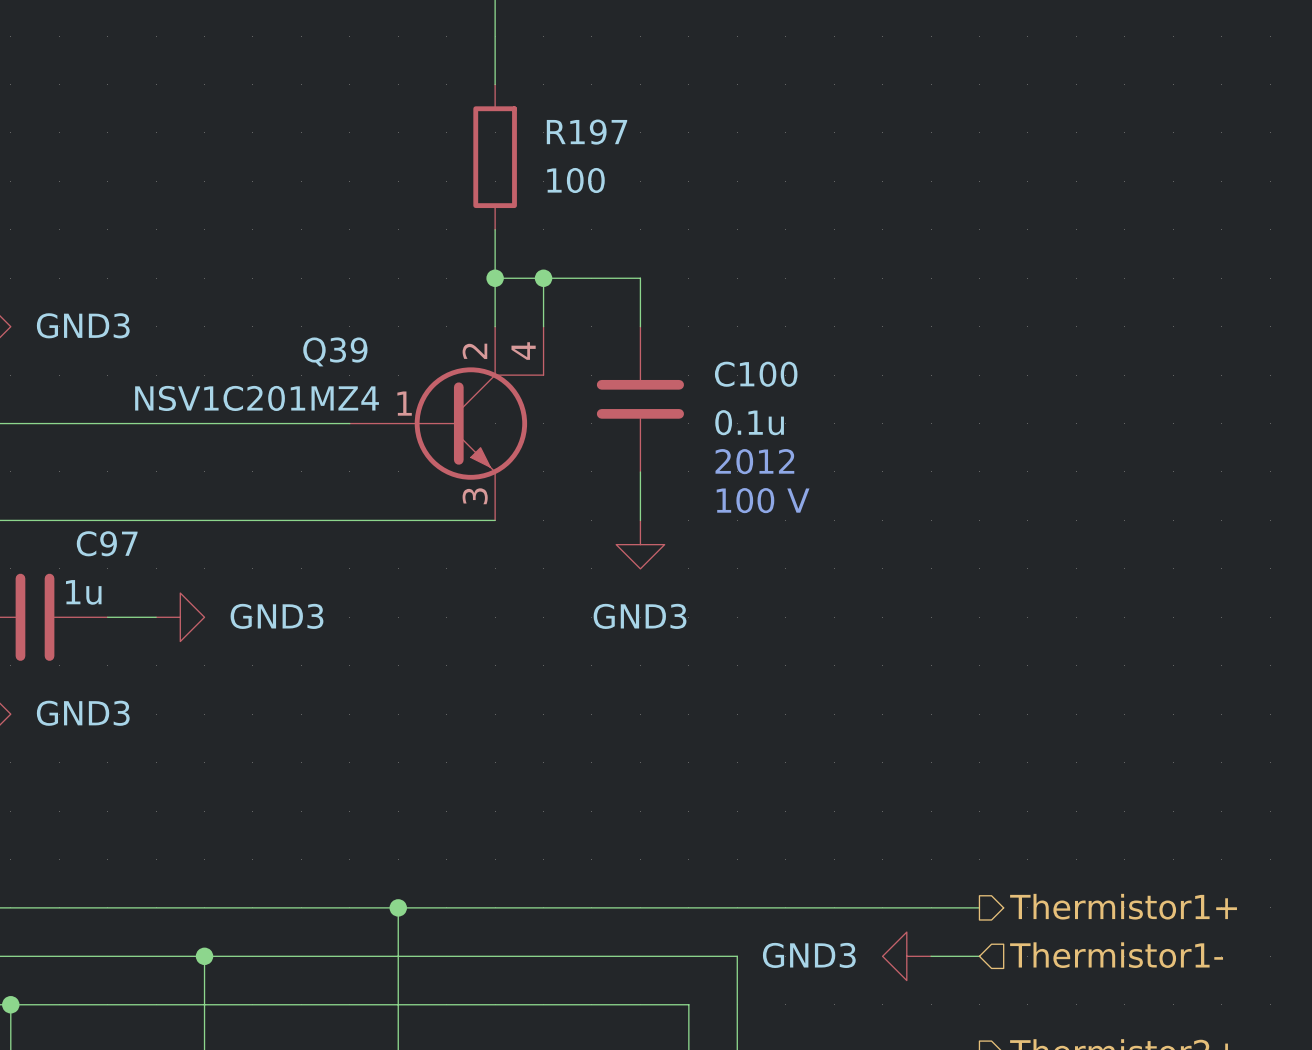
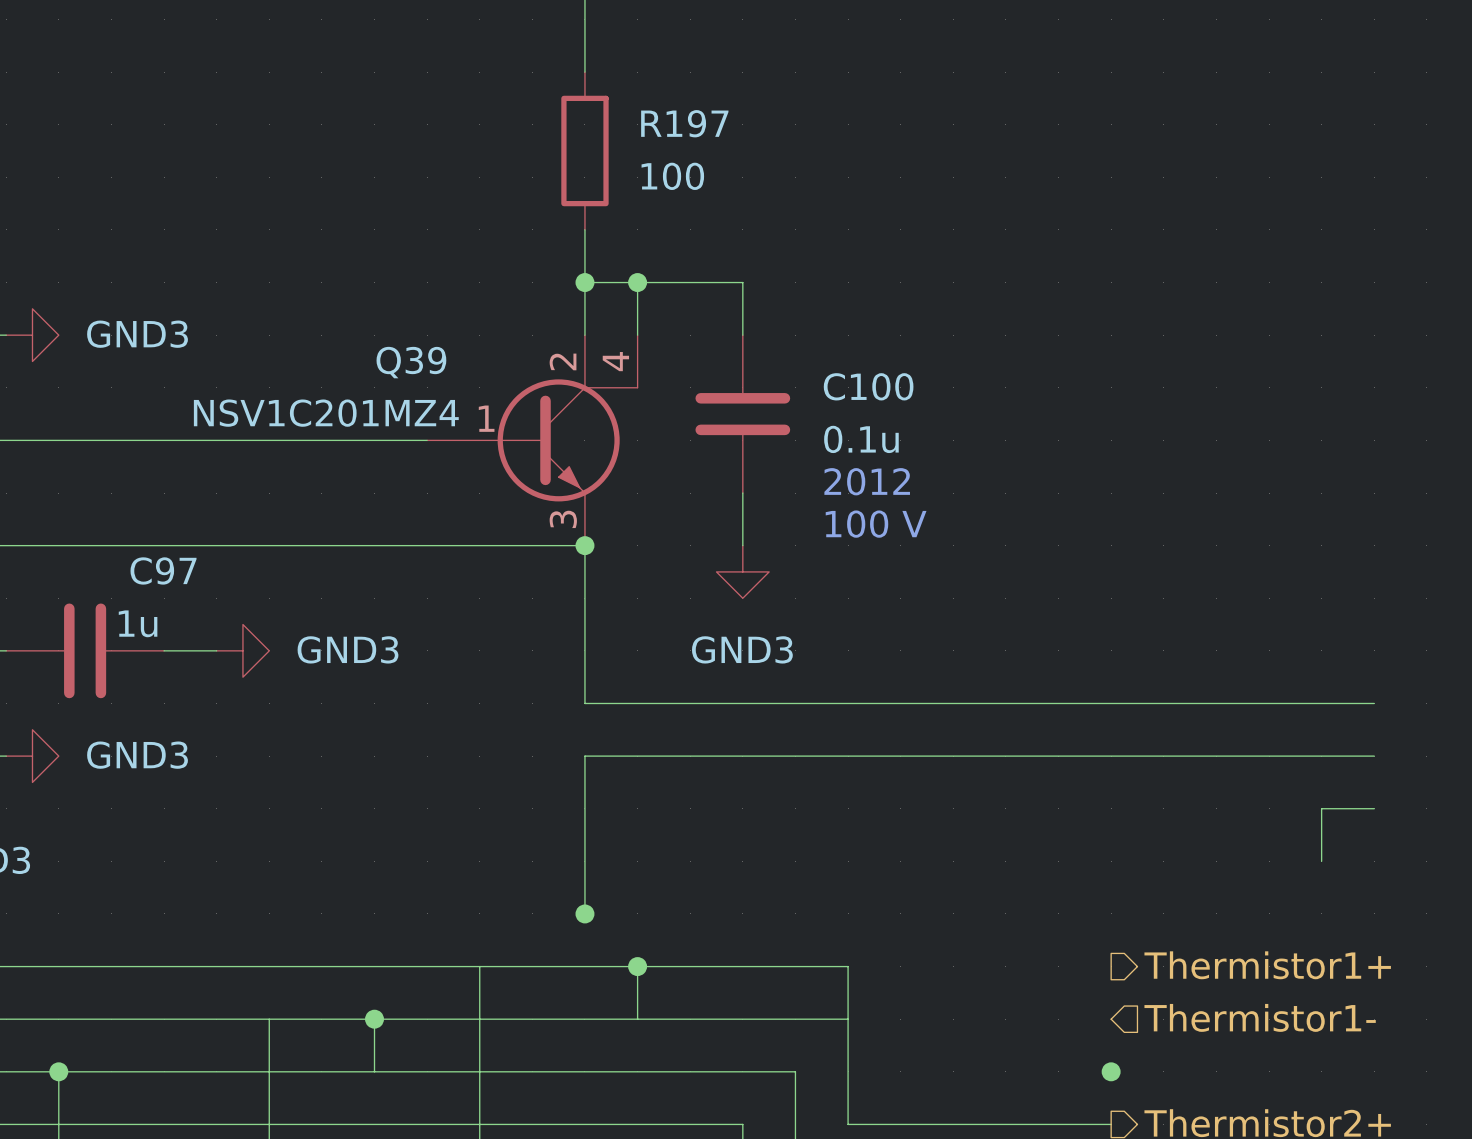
wire: none -> (584, 545) (584, 703) (1374, 703)
junction: none -> (584, 545)
wire: none -> (1374, 756) (584, 756) (584, 913)
wire: none -> (1374, 808) (1321, 808) (1321, 861)
junction: none -> (584, 913)
junction: (398, 907) -> none
wire: none -> (637, 966) (637, 1019)
junction: none -> (637, 966)
wire: (737, 907) (979, 907) -> (848, 966) (848, 1019)
junction: (204, 956) -> none
wire: none -> (374, 1019) (374, 1071)
junction: none -> (374, 1019)
power symbol: GND3 (906, 956) -> none
wire: (931, 956) (979, 956) -> none
junction: none -> (1111, 1071)

